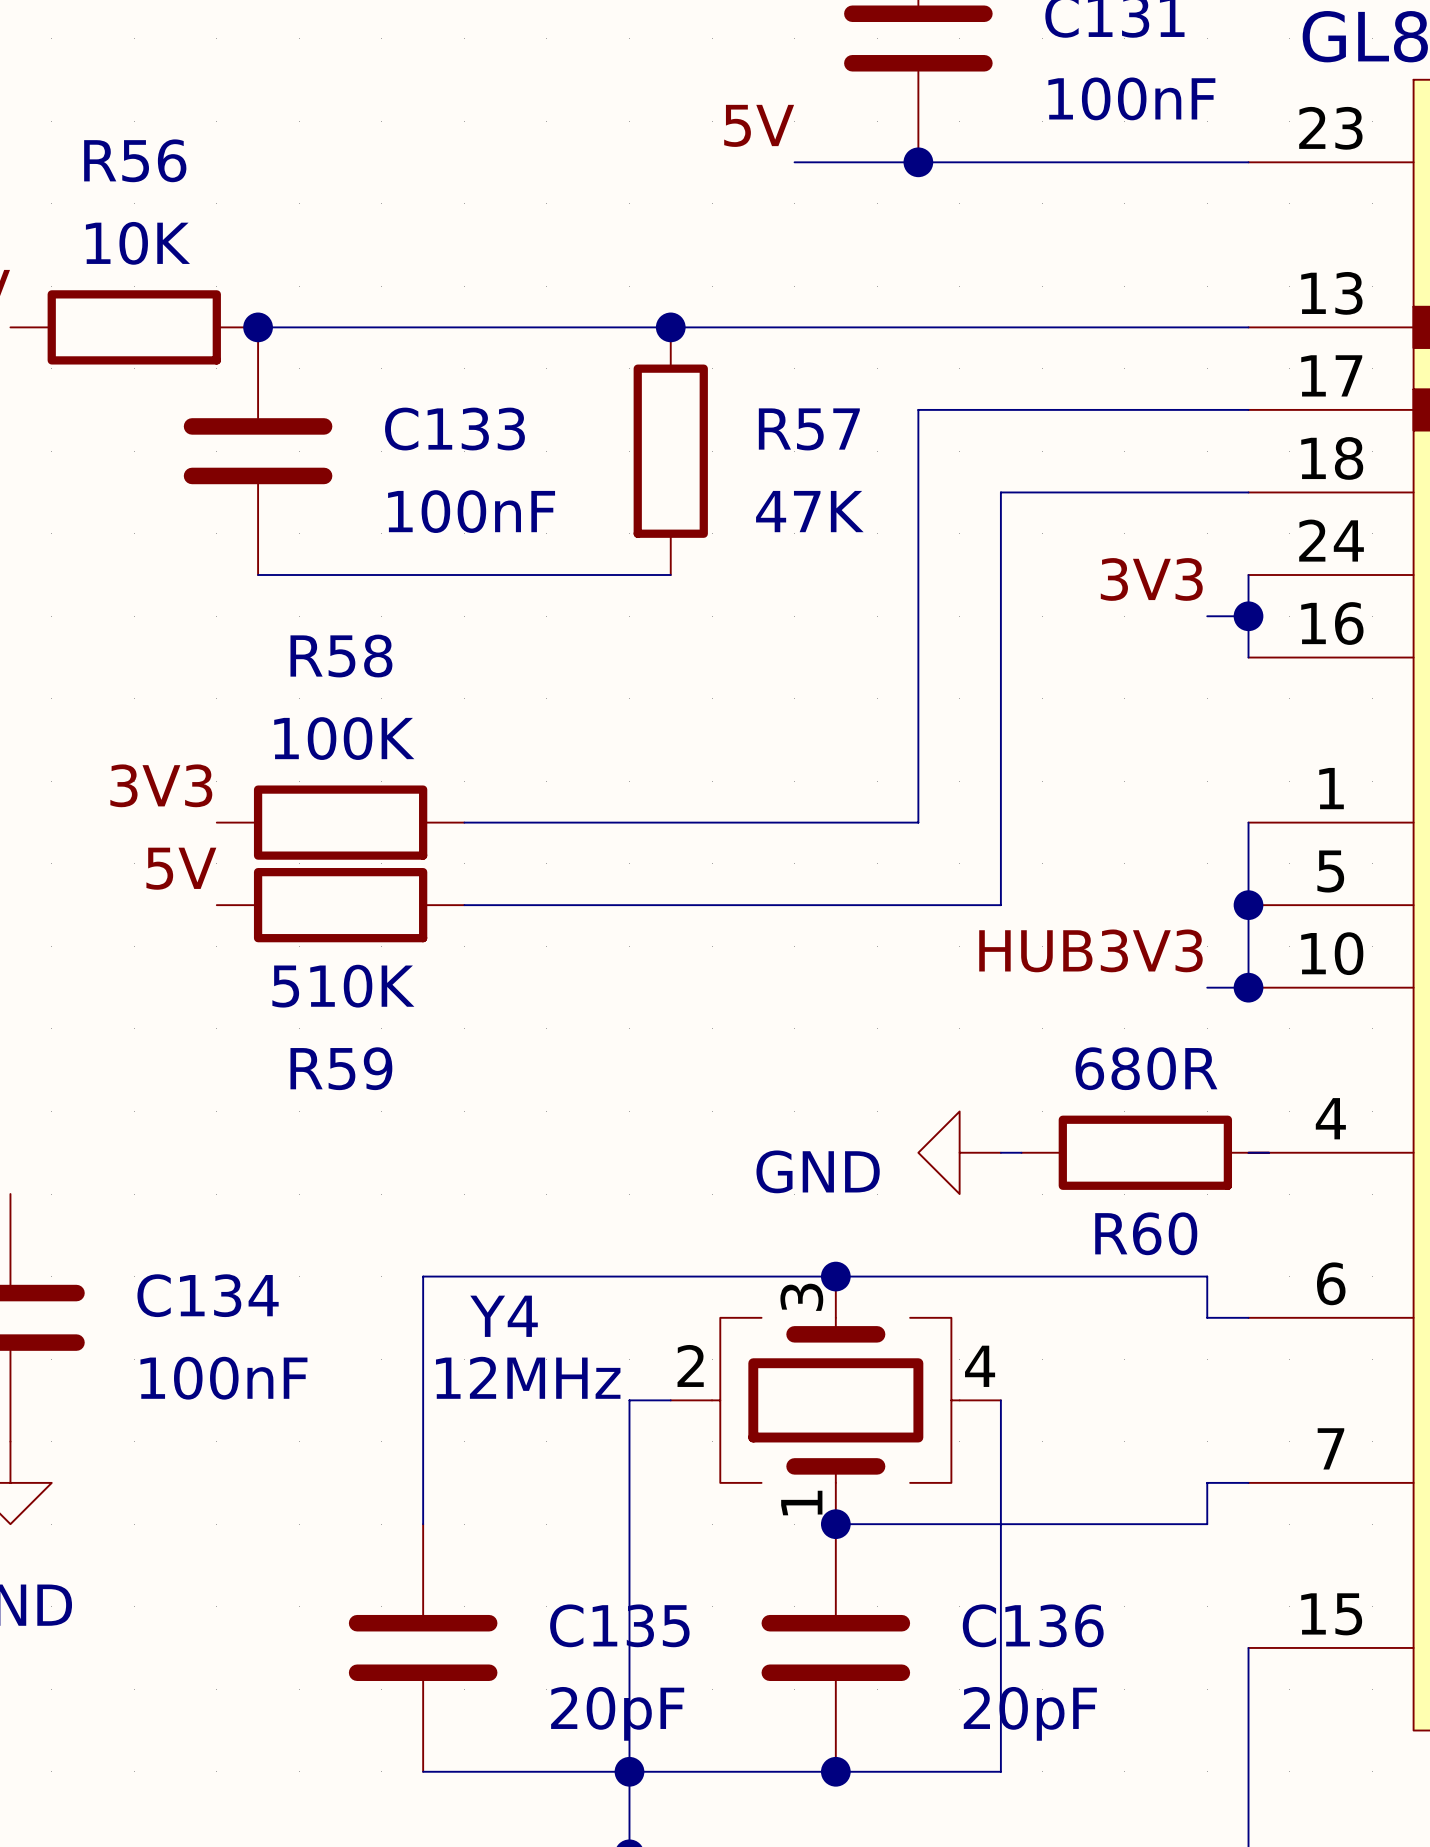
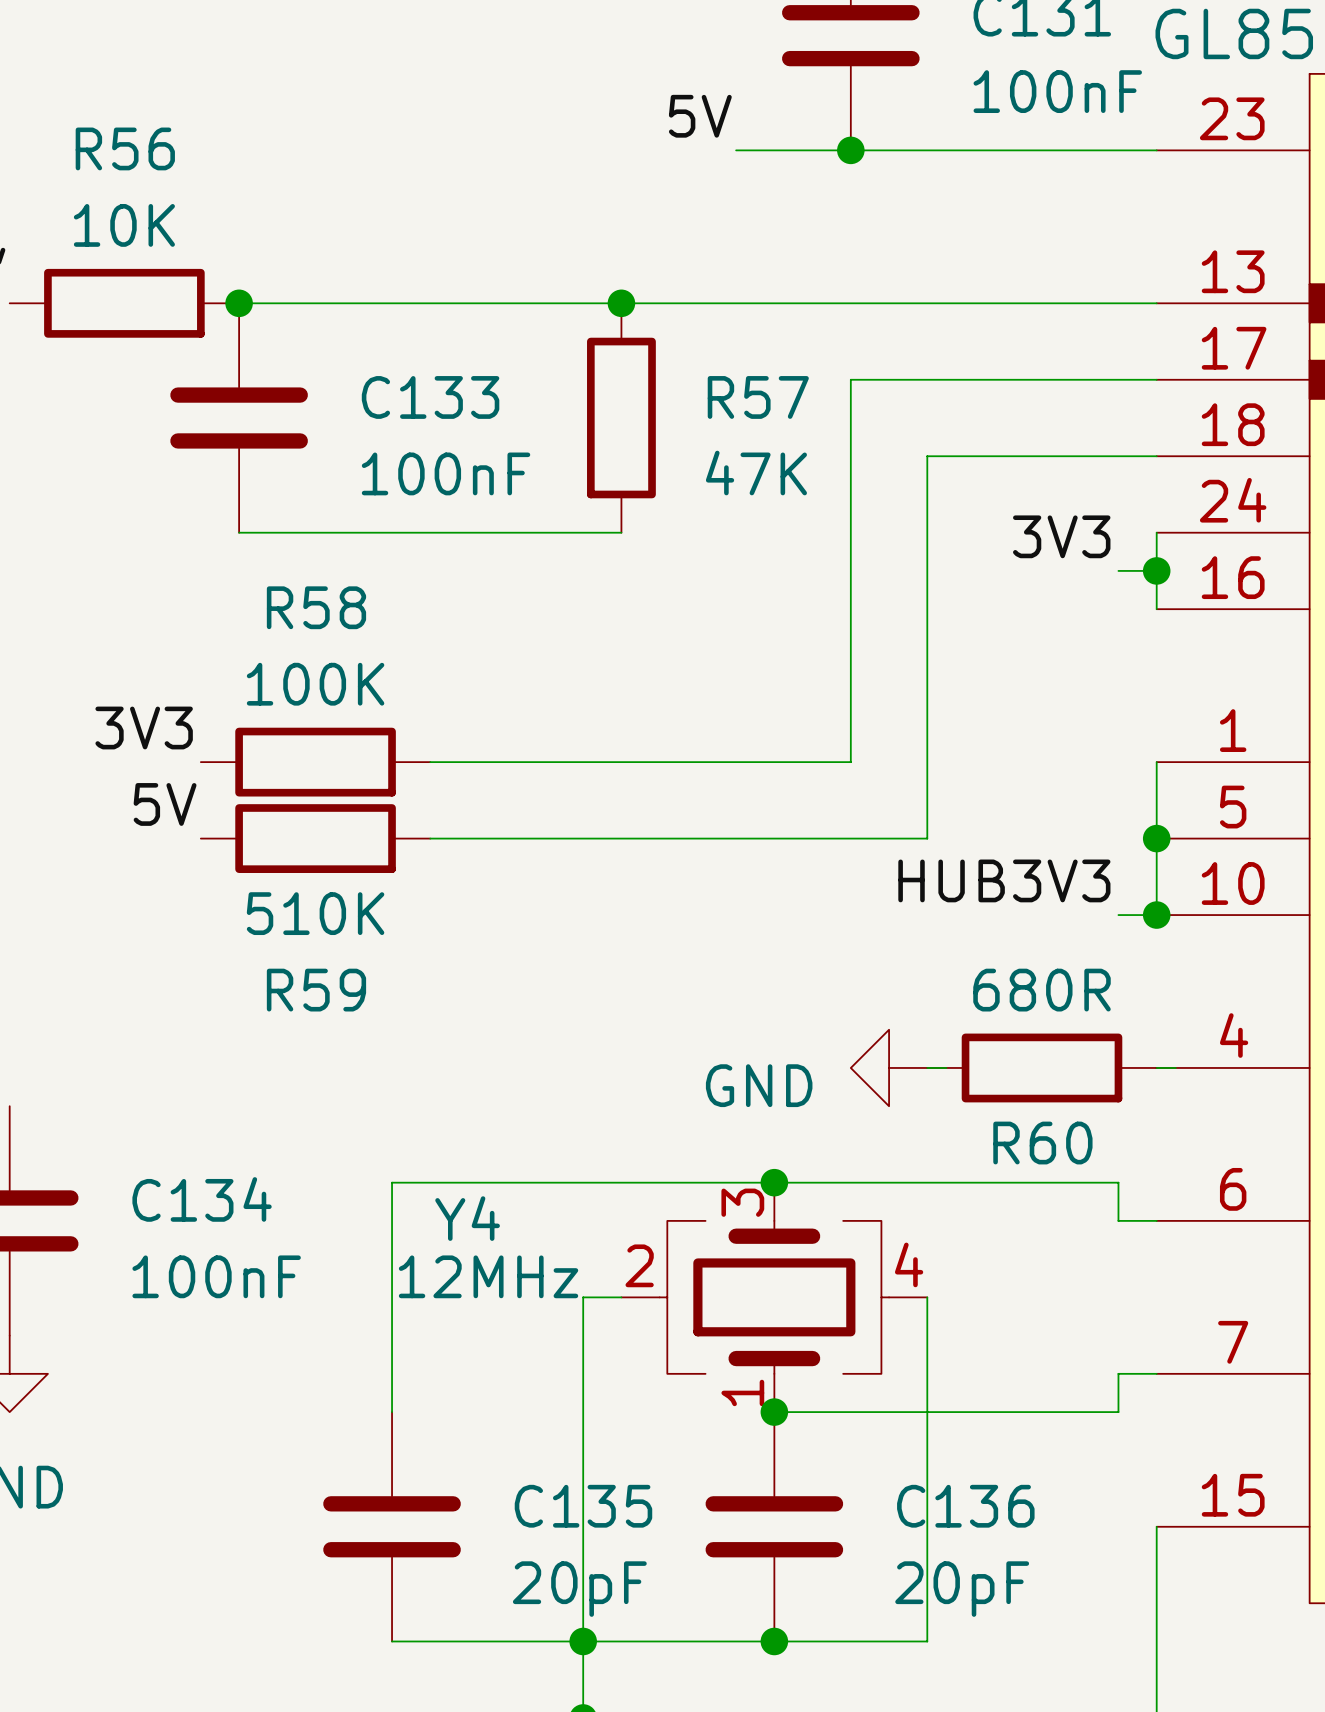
R60 position: (1145, 1152) -> (1042, 1067)

